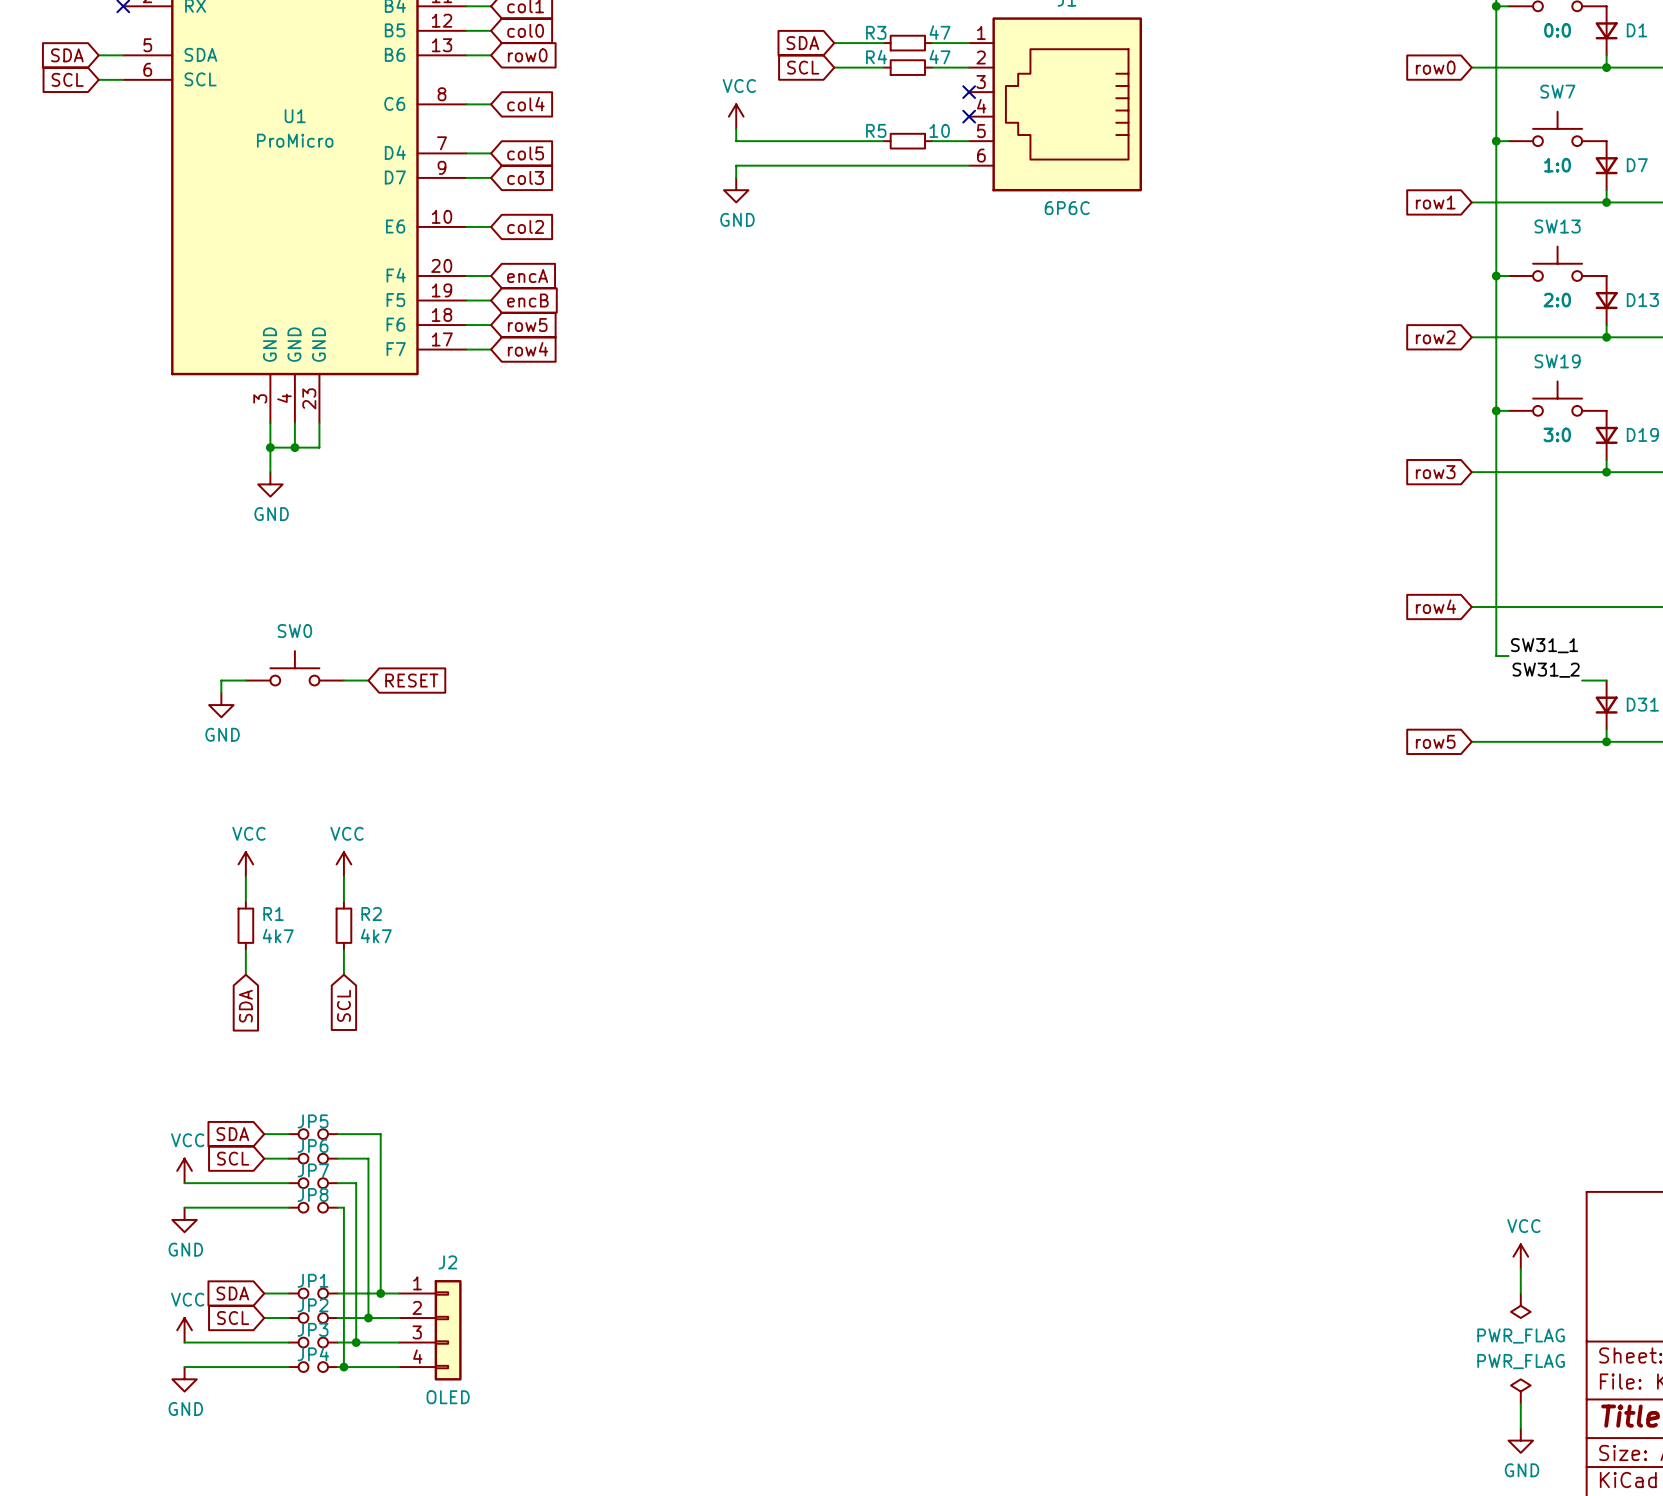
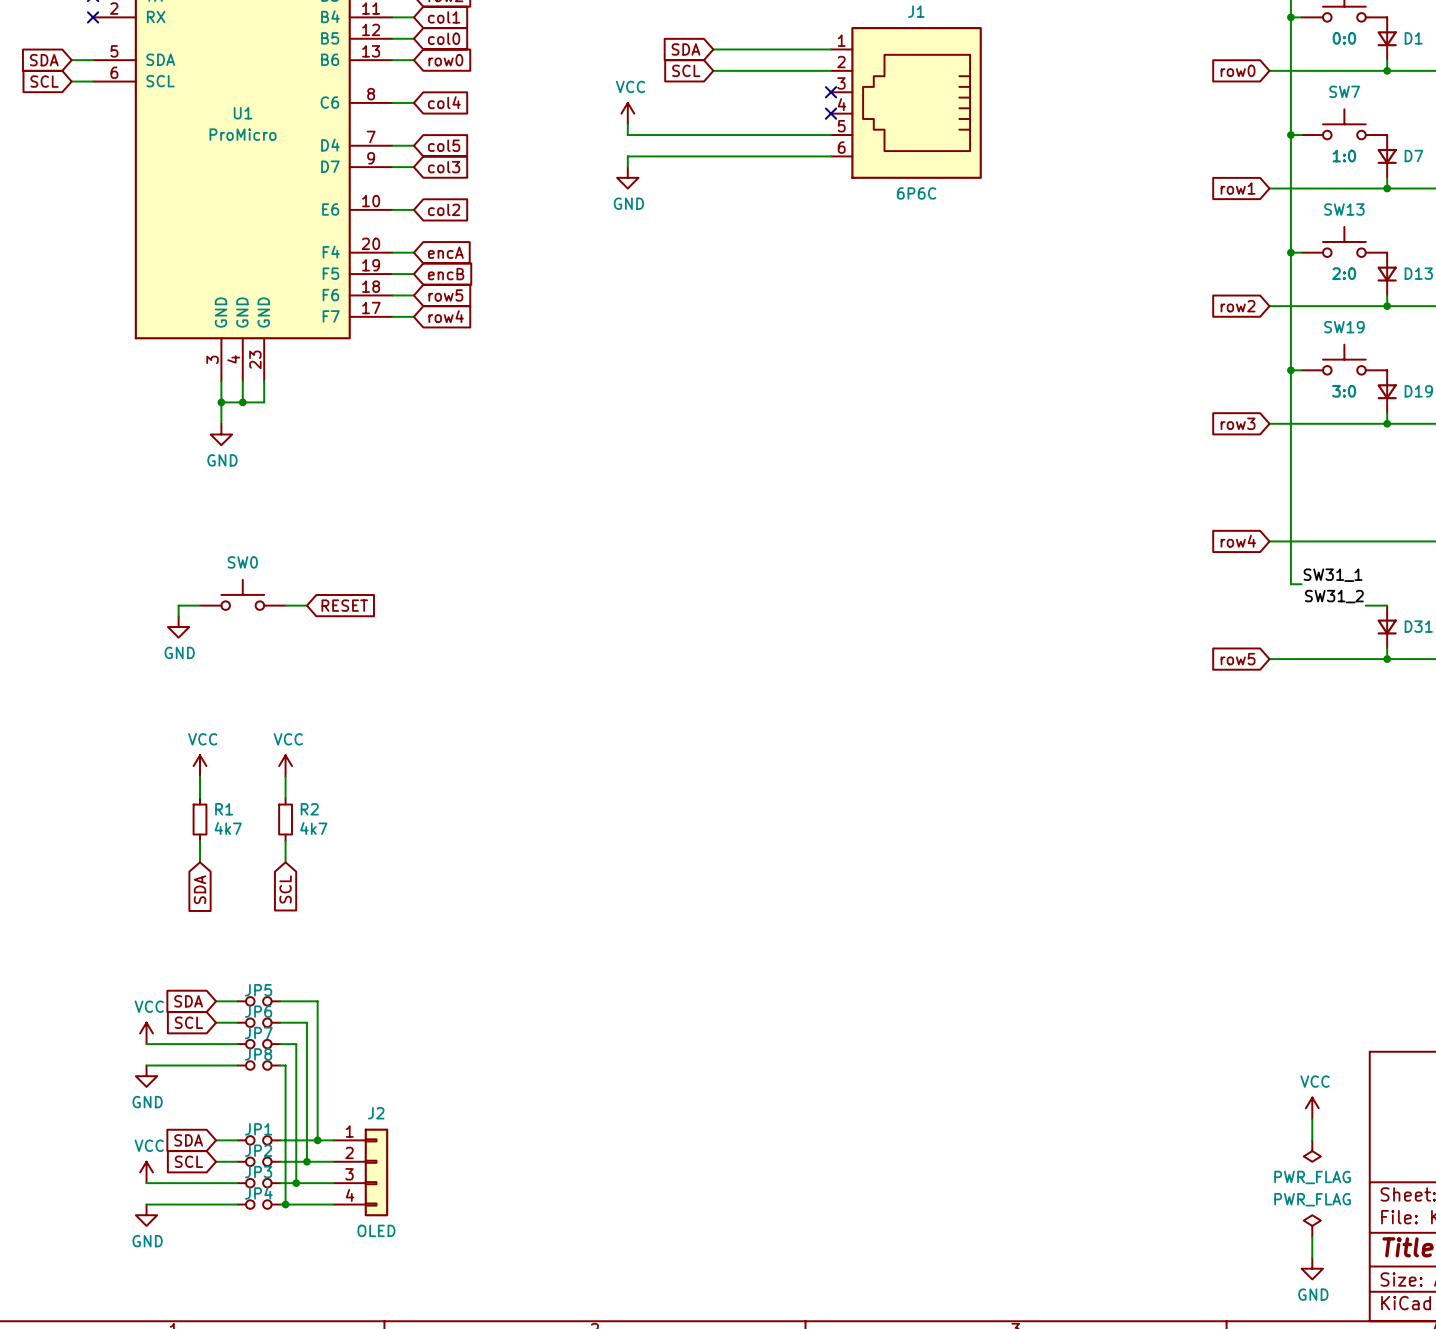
wire: none -> (756, 49) (798, 49)
R3: 47 (907, 43) -> none
wire: none -> (756, 70) (798, 70)
R4: 47 (907, 67) -> none
wire: none -> (756, 135) (798, 135)
R5: 10 (907, 141) -> none

